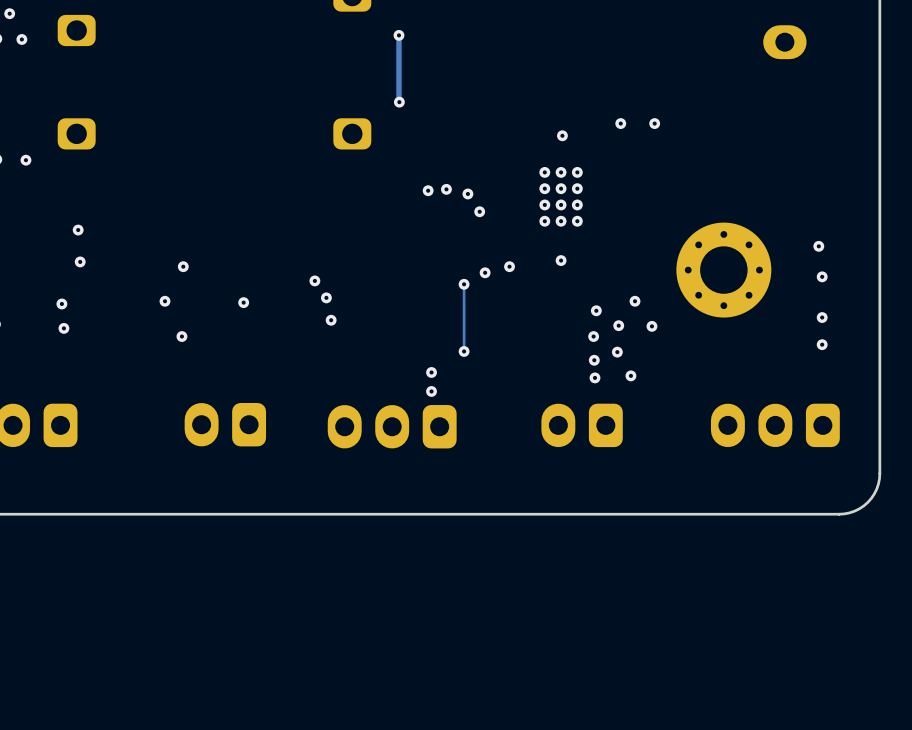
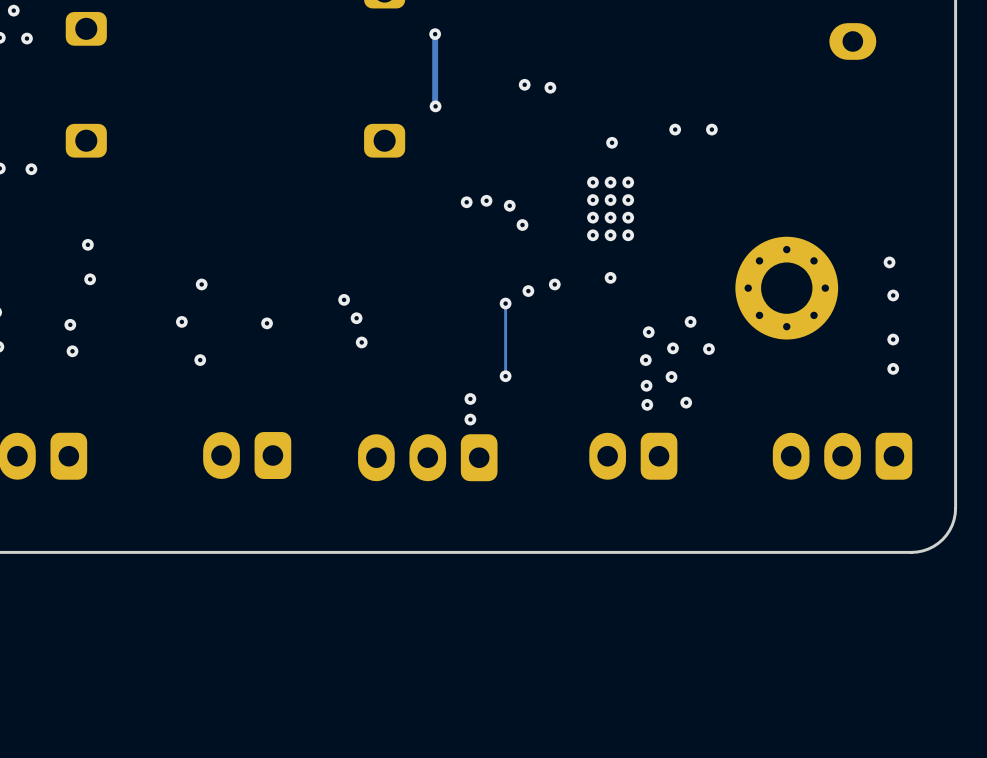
via: none -> (524, 84)
via: none -> (550, 87)

